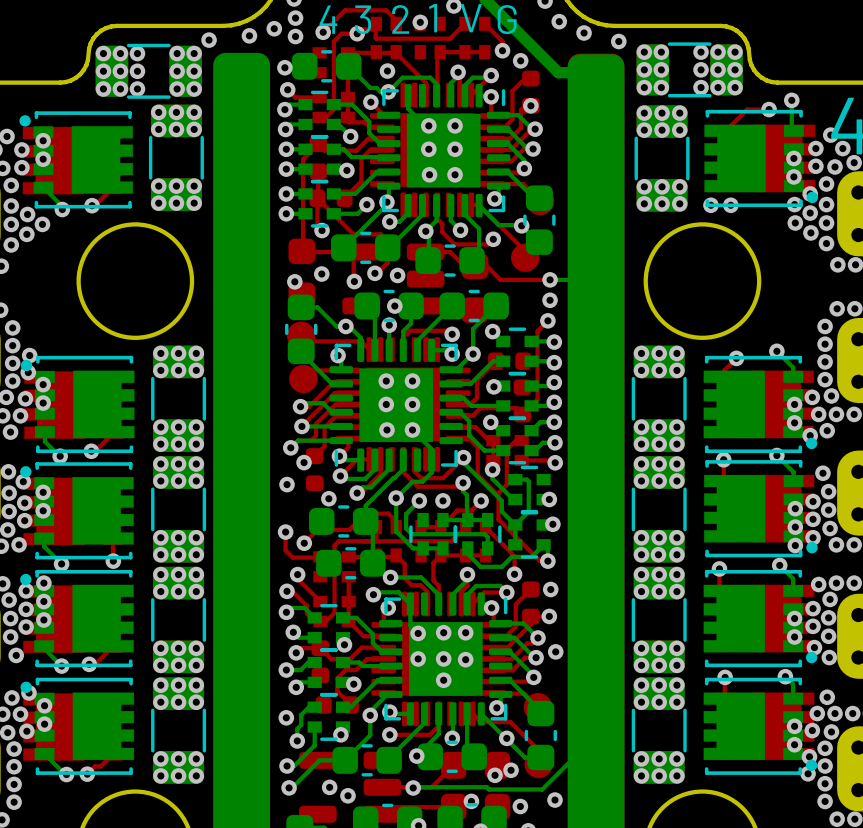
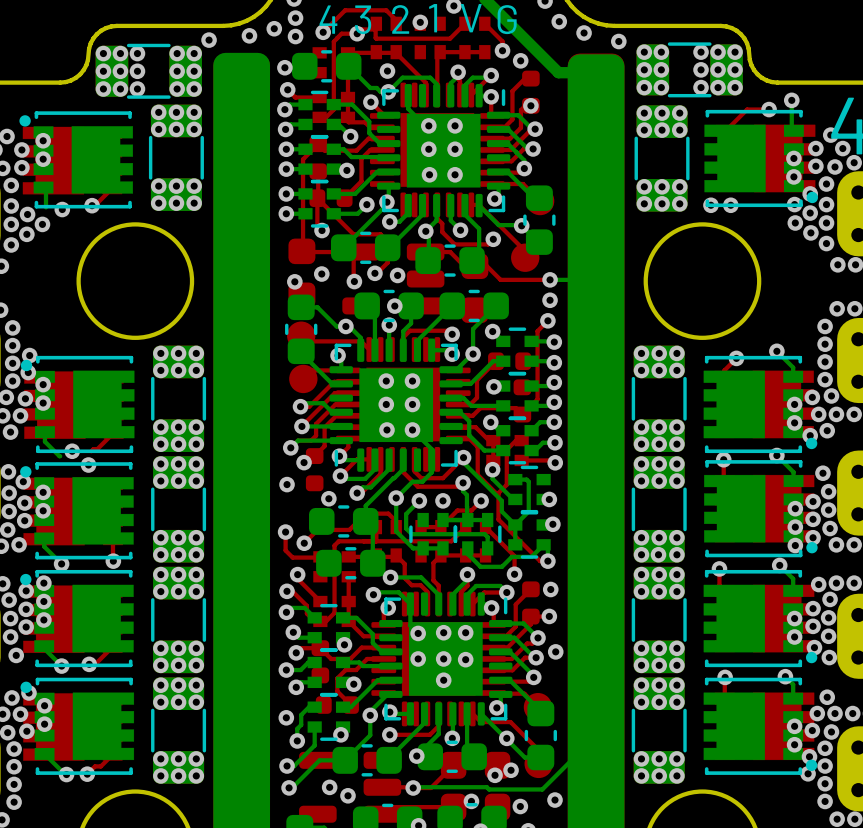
bottom track: (46, 190) (62, 206) (62, 209) -> (46, 190) (46, 207)
via position: (91, 451) -> (88, 465)
via position: (60, 456) -> (72, 451)

